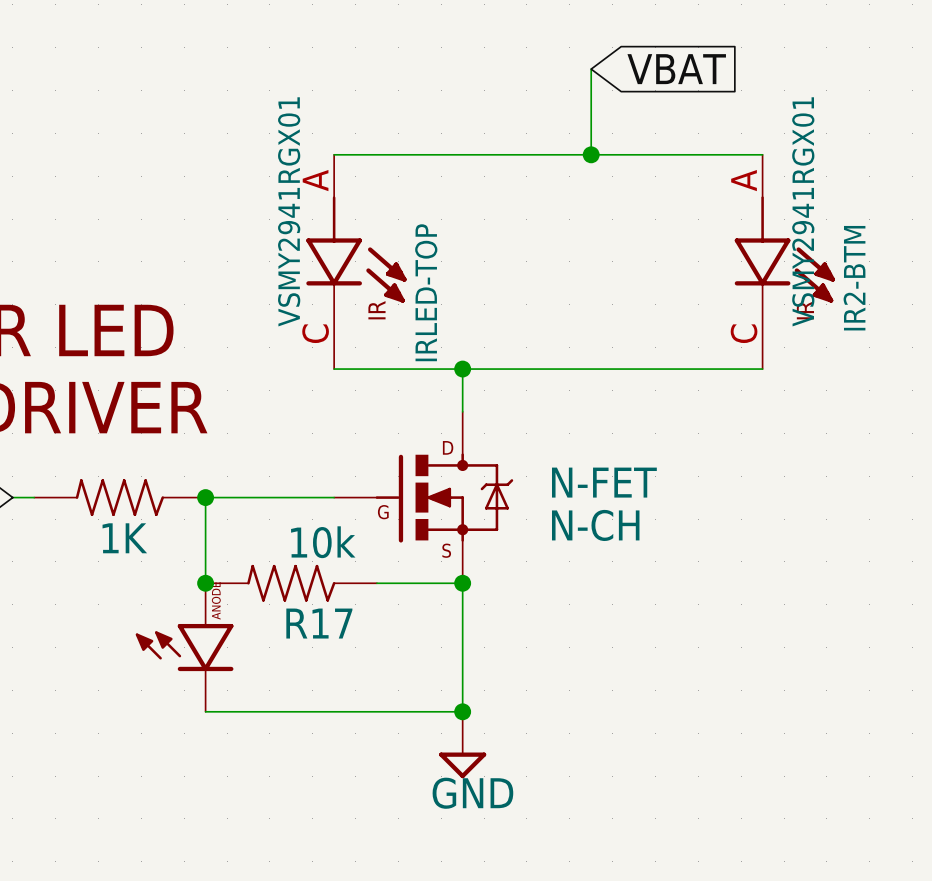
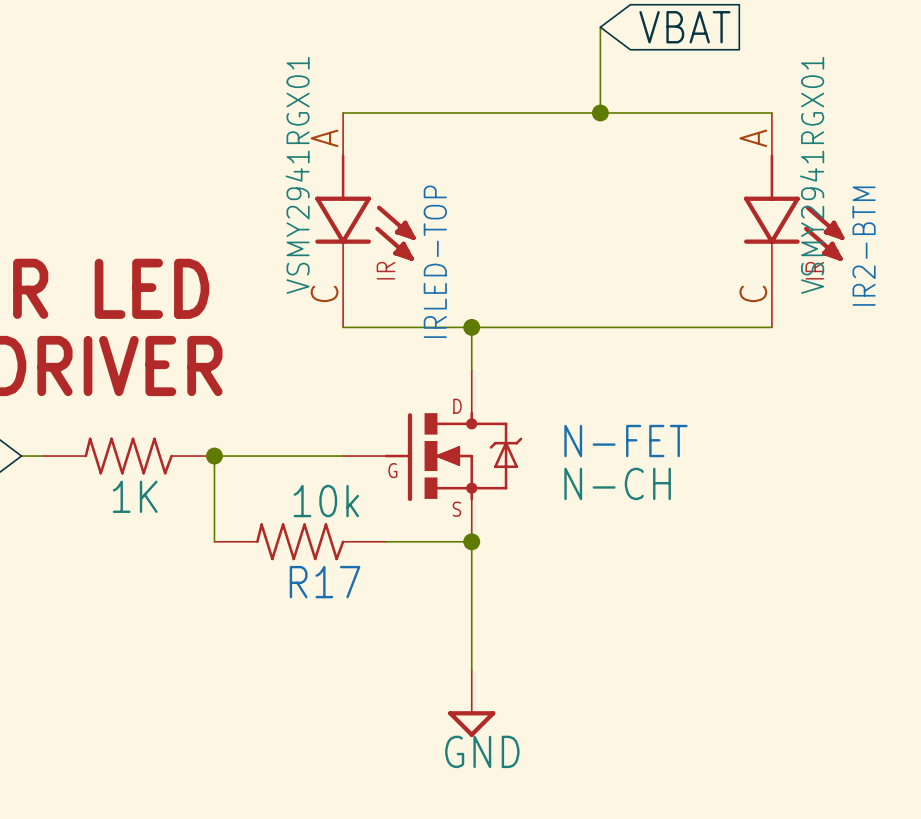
junction: (205, 583) -> none
part: (184, 647) -> none
wire: (205, 711) (462, 711) -> none
junction: (462, 711) -> none

